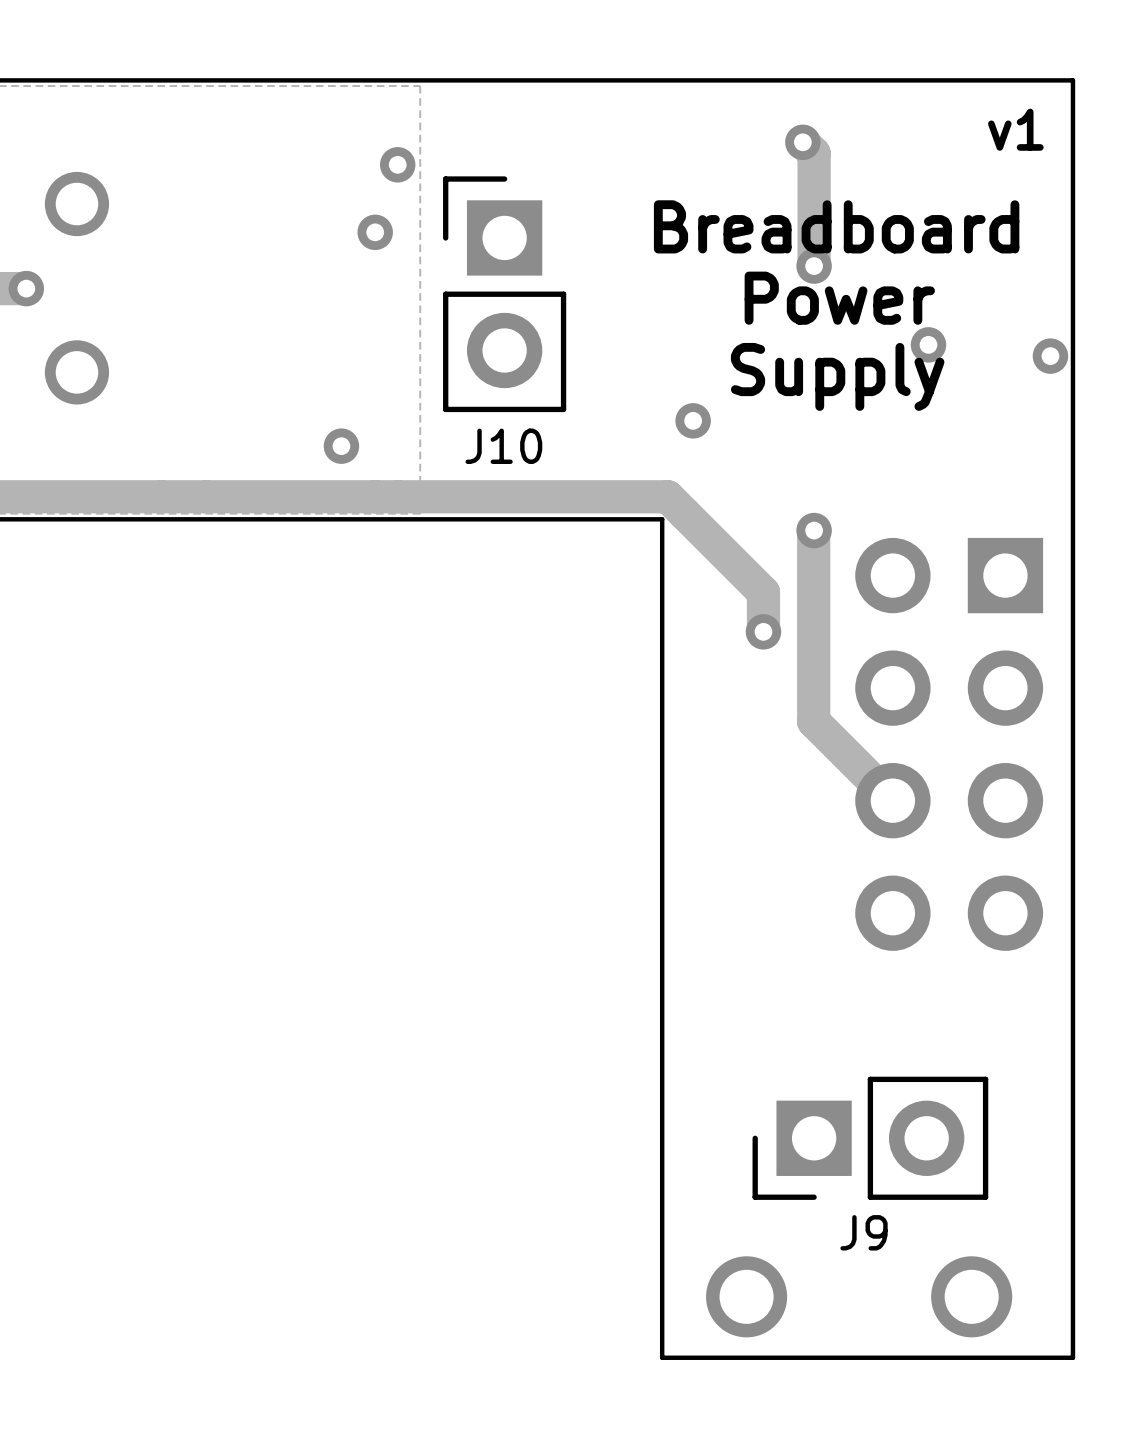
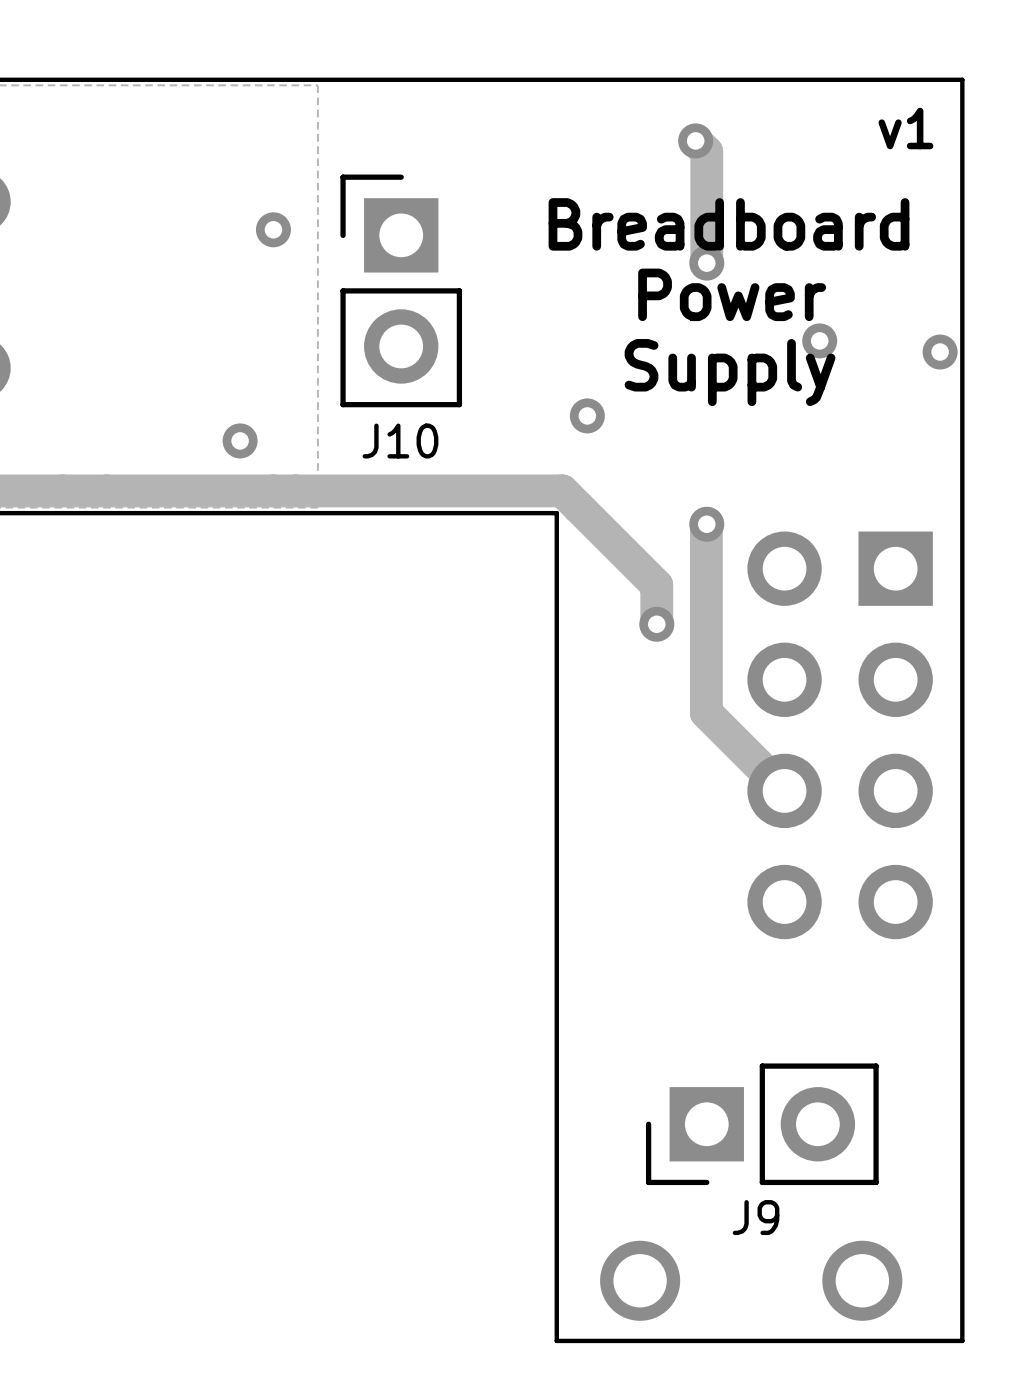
via: (397, 164) -> none

